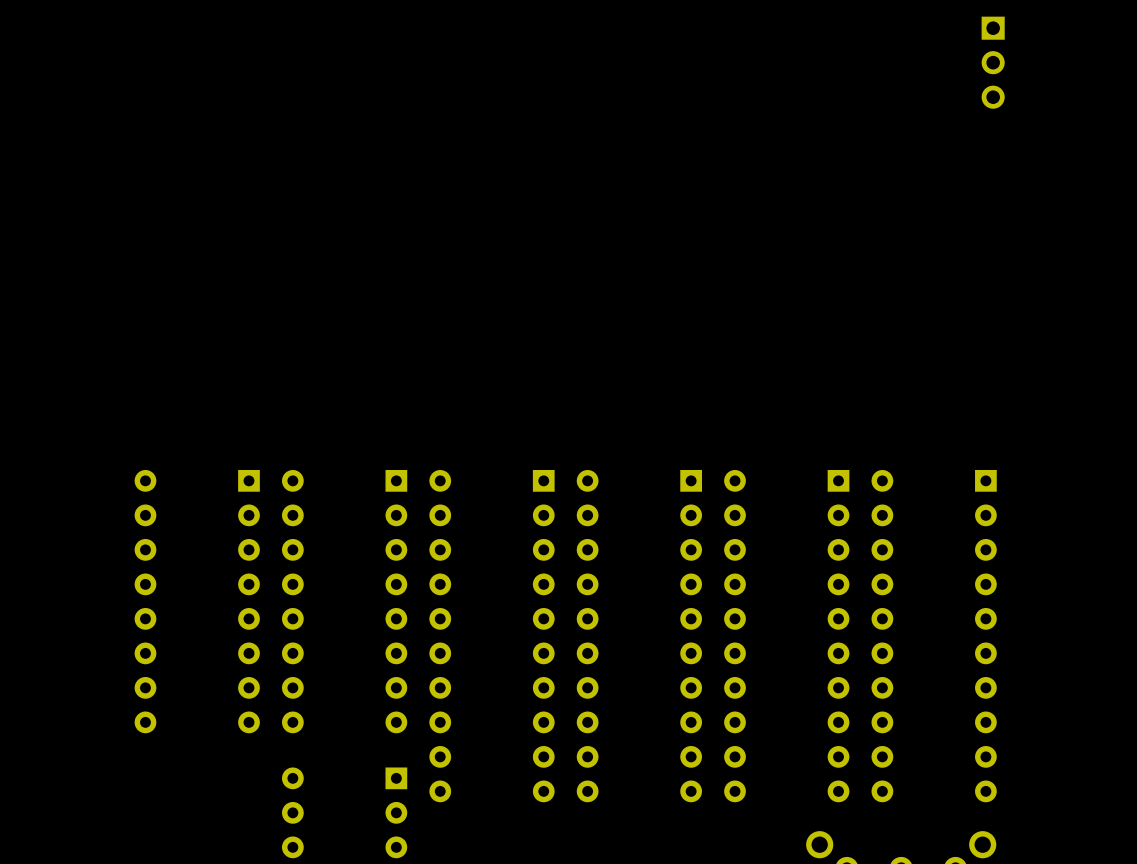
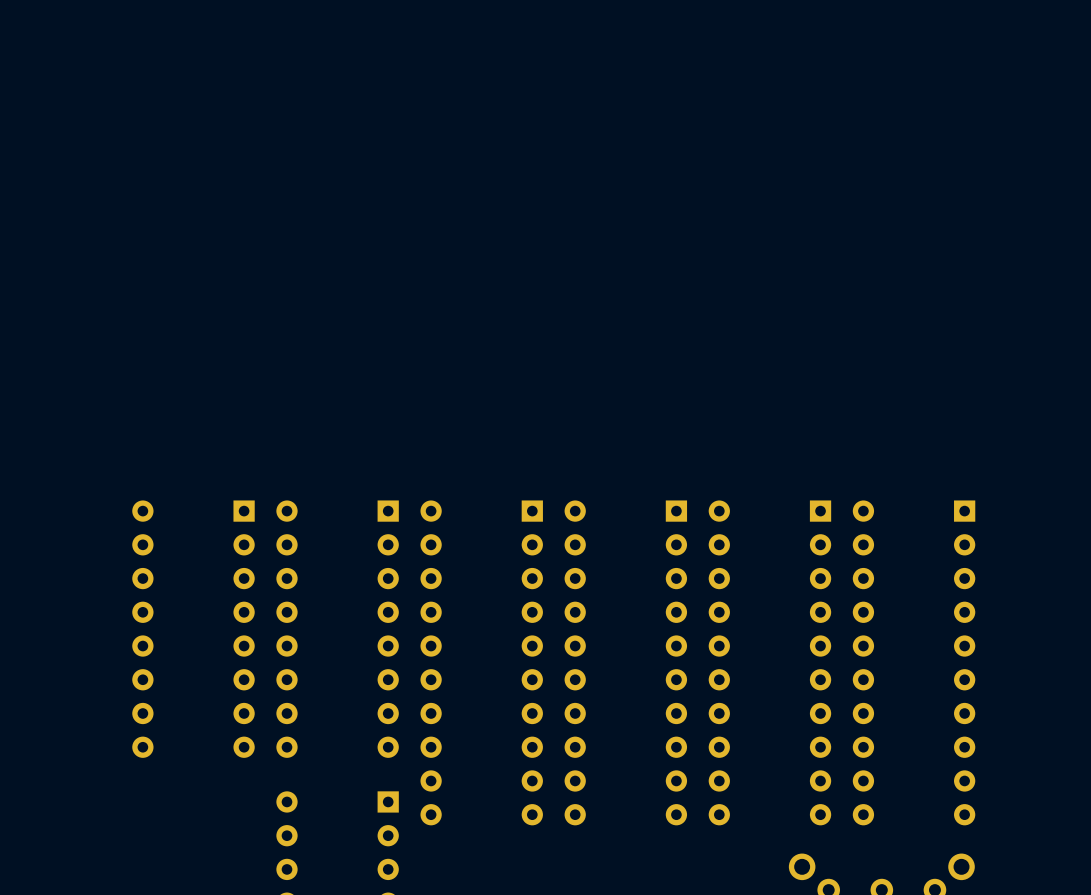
part: (993, 62) -> none

